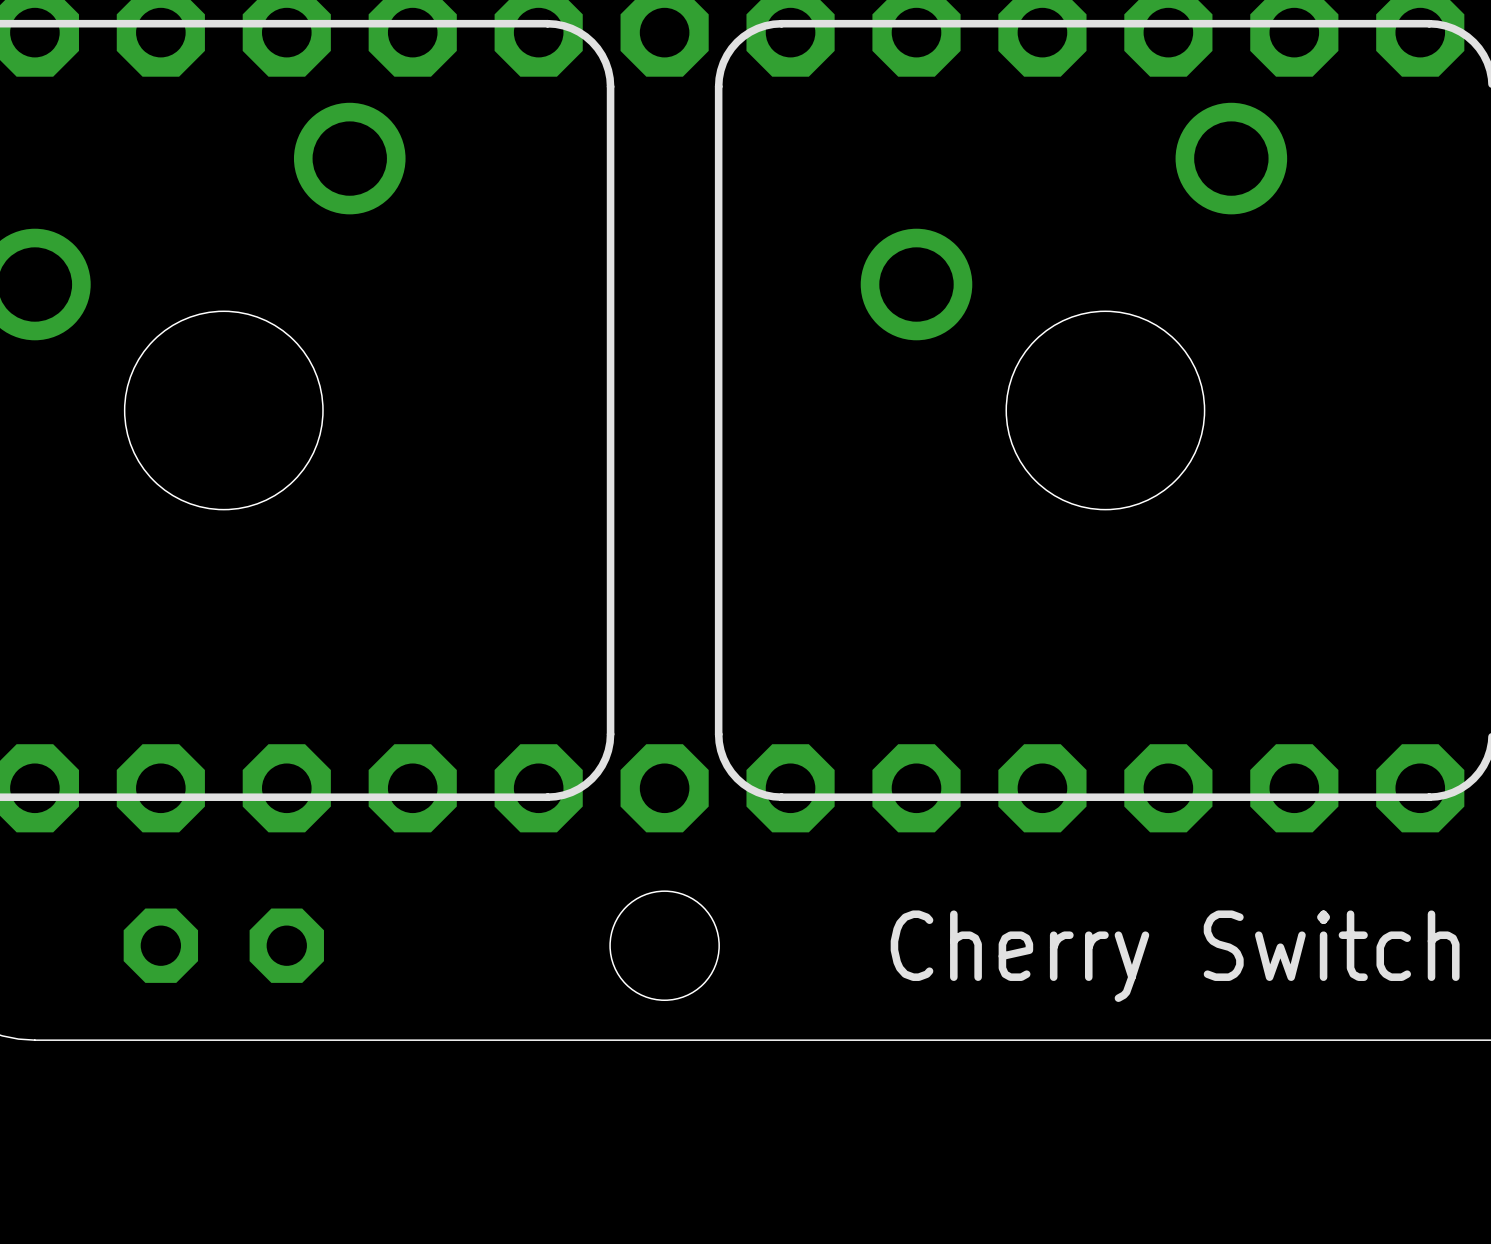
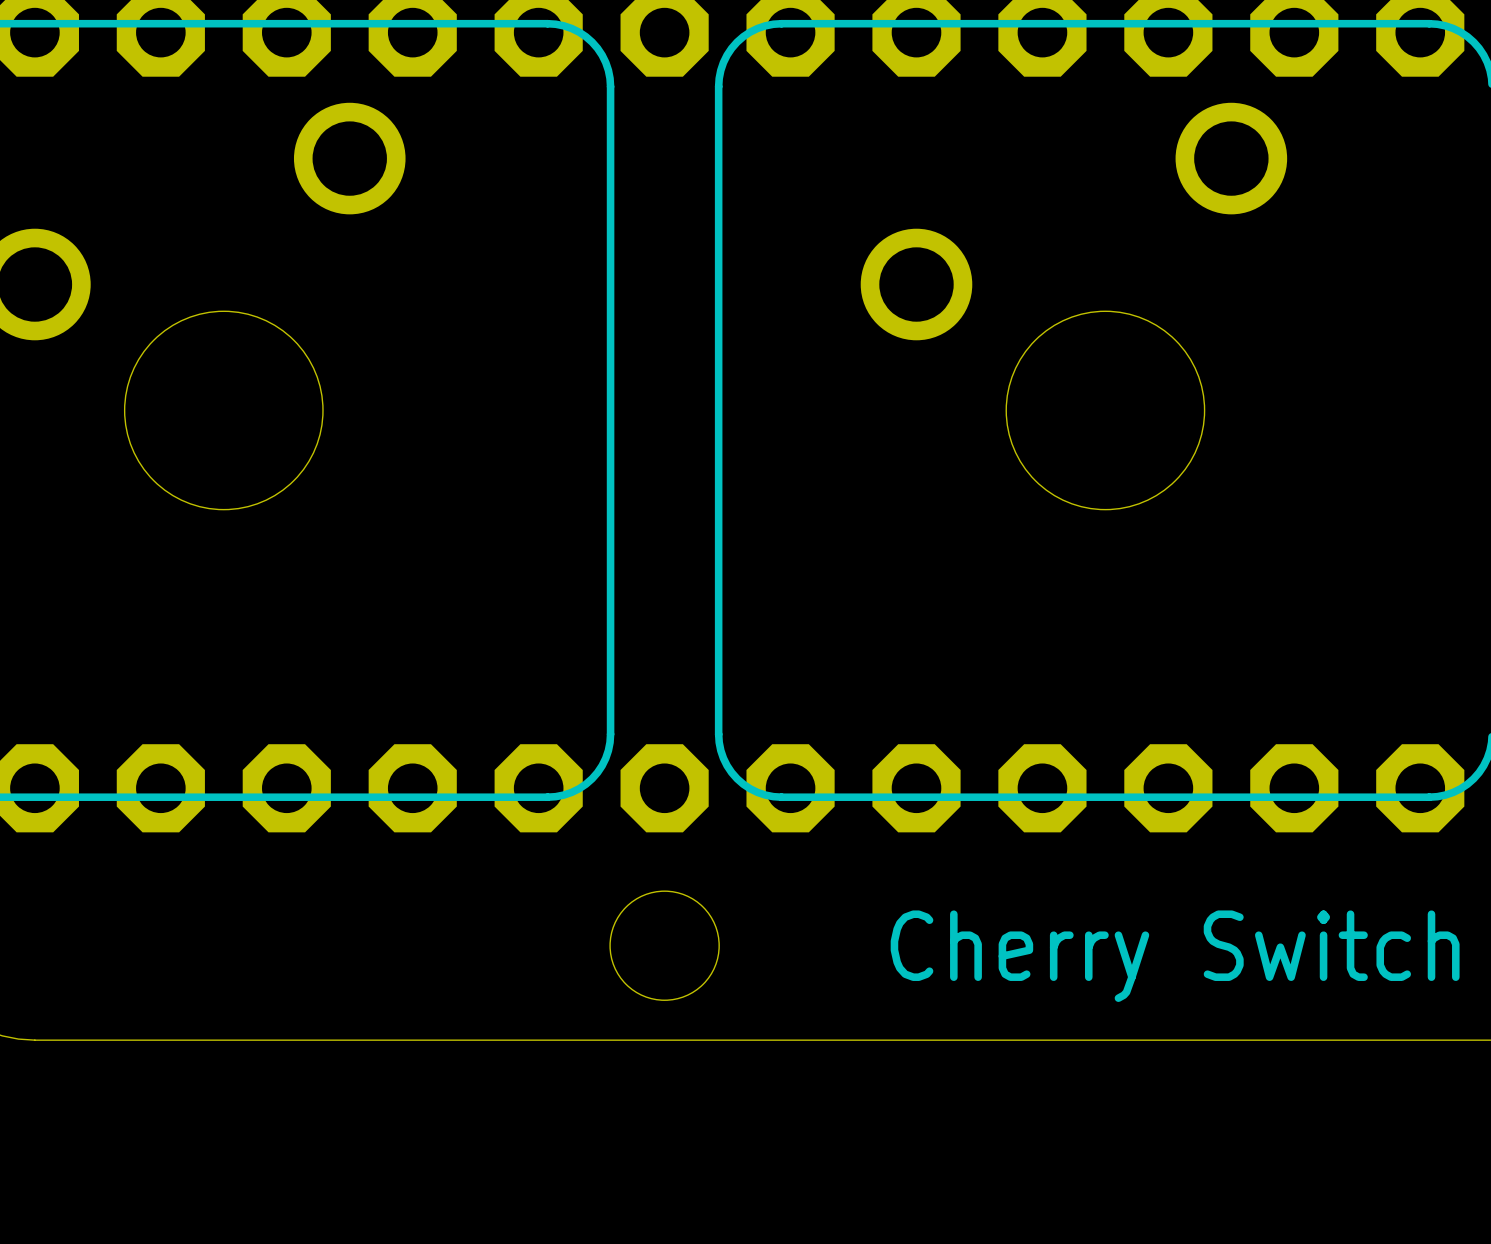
part: (223, 945) -> none

